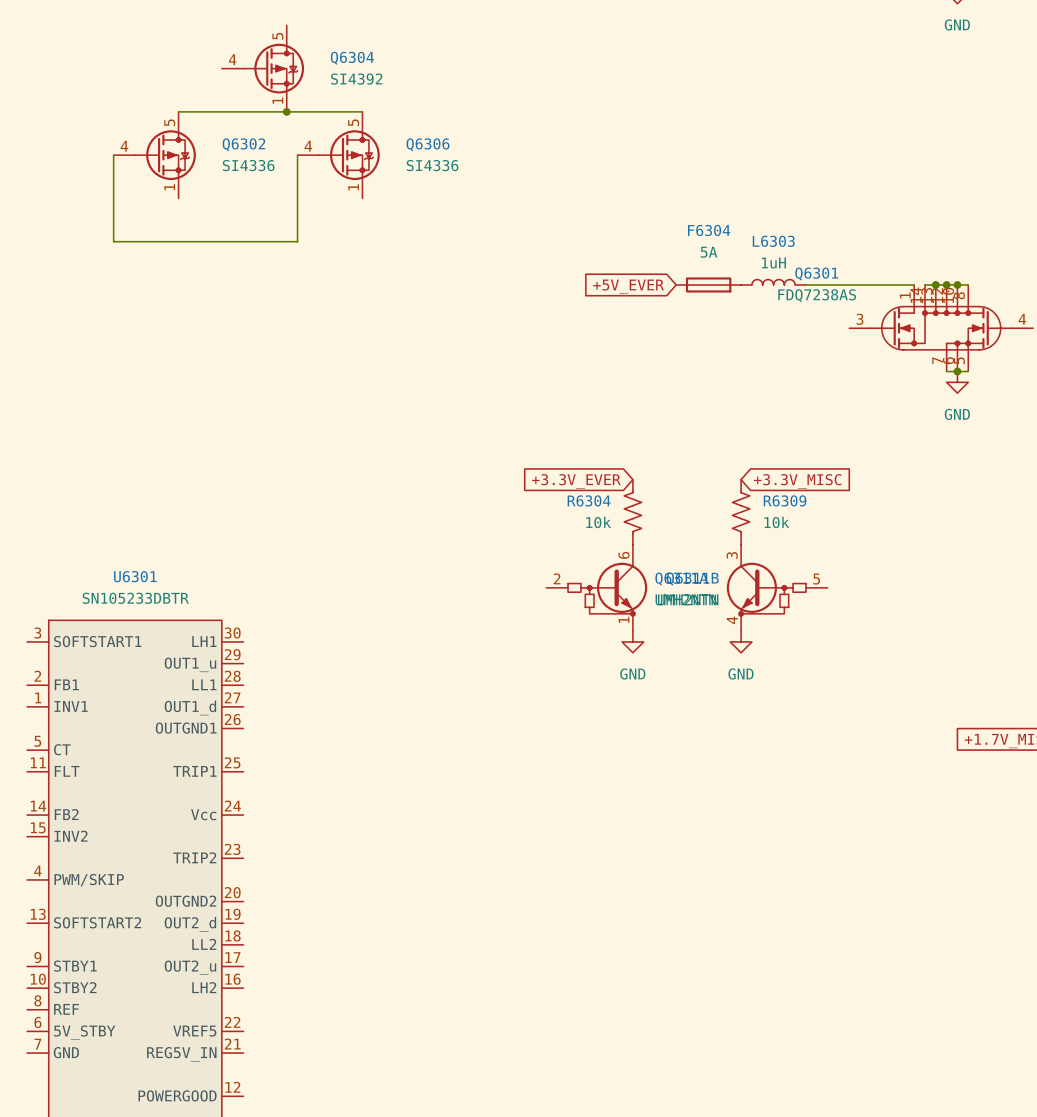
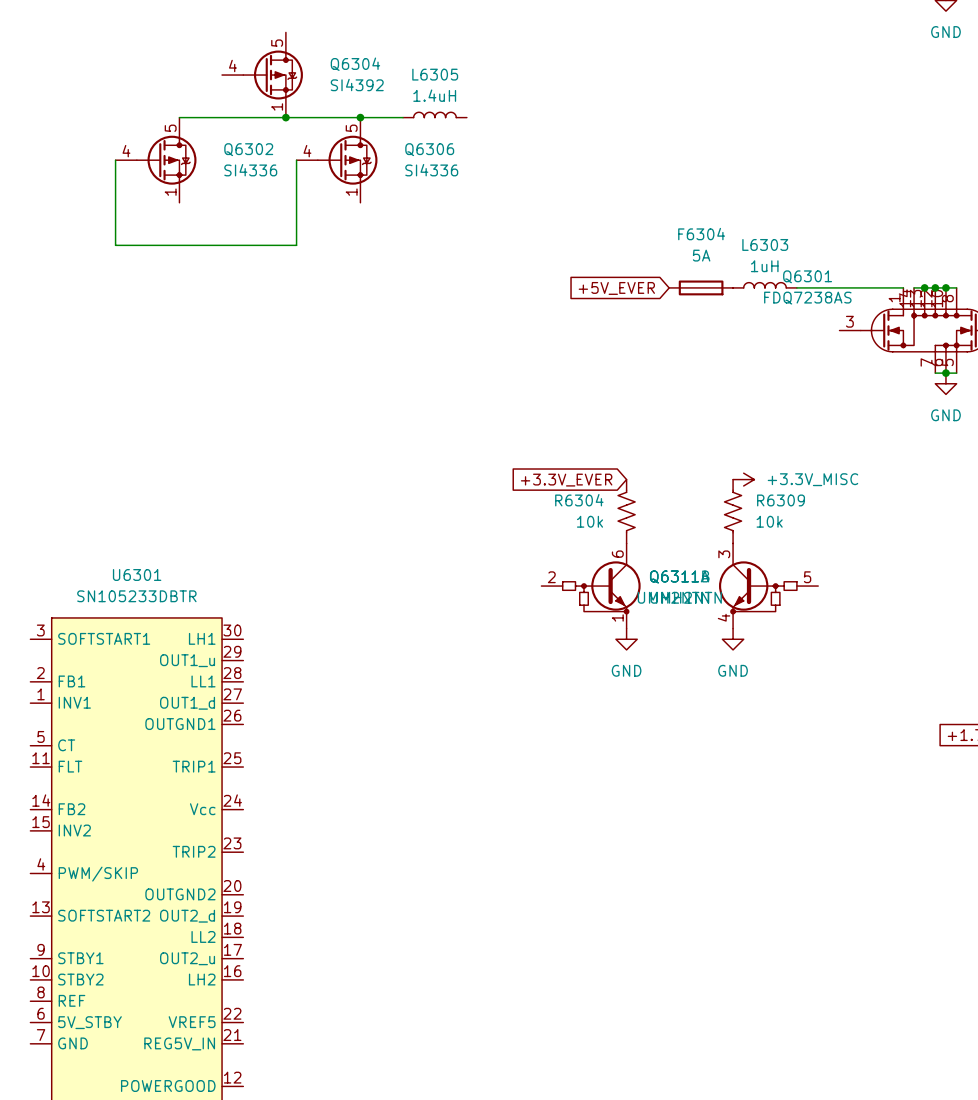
L6305: none -> 1.4uH (434, 114)
wire: none -> (360, 117) (403, 117)
junction: none -> (360, 117)
power symbol: none -> +3.3V_MISC (743, 479)
global label: +3.3V_MISC (797, 481) -> none

